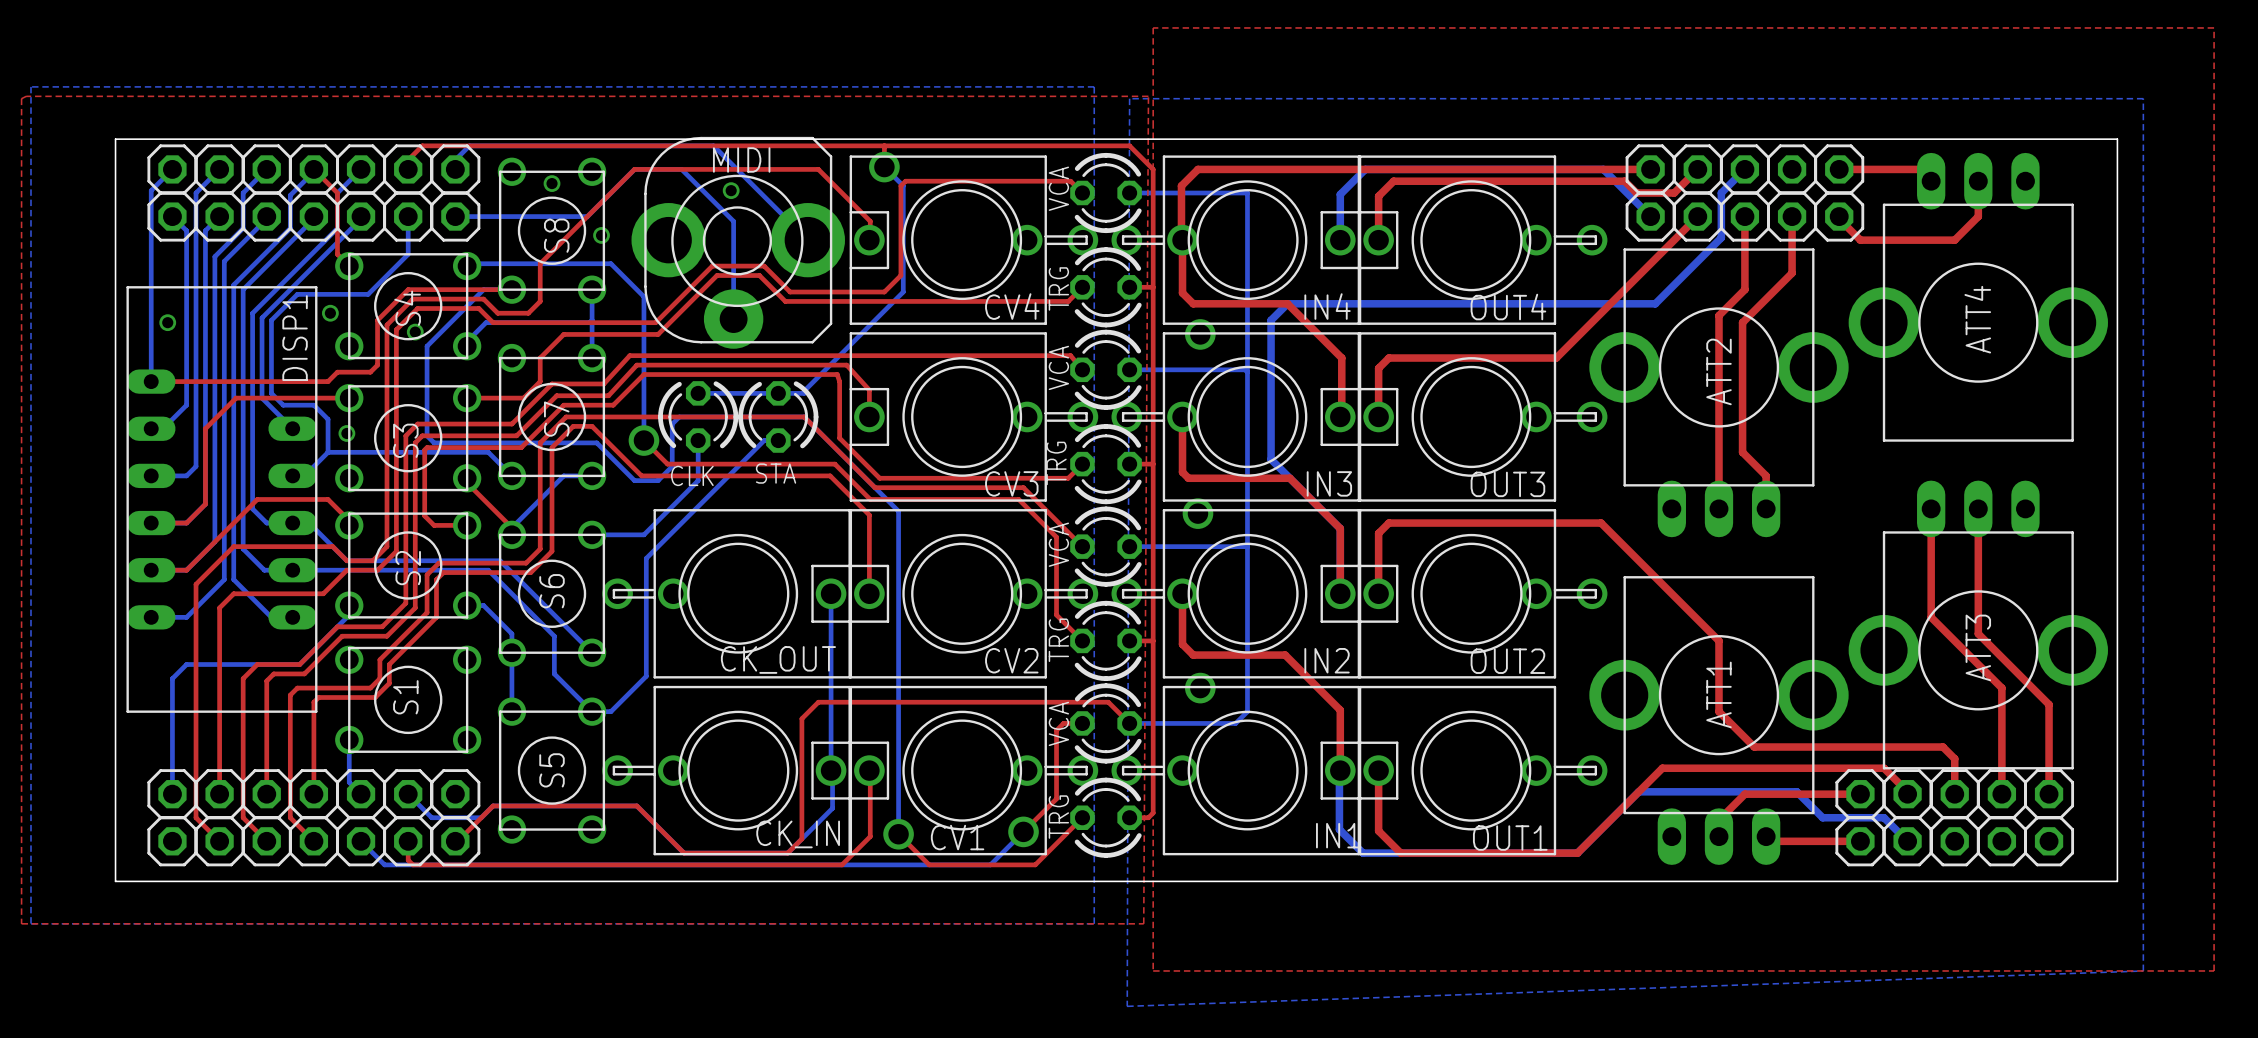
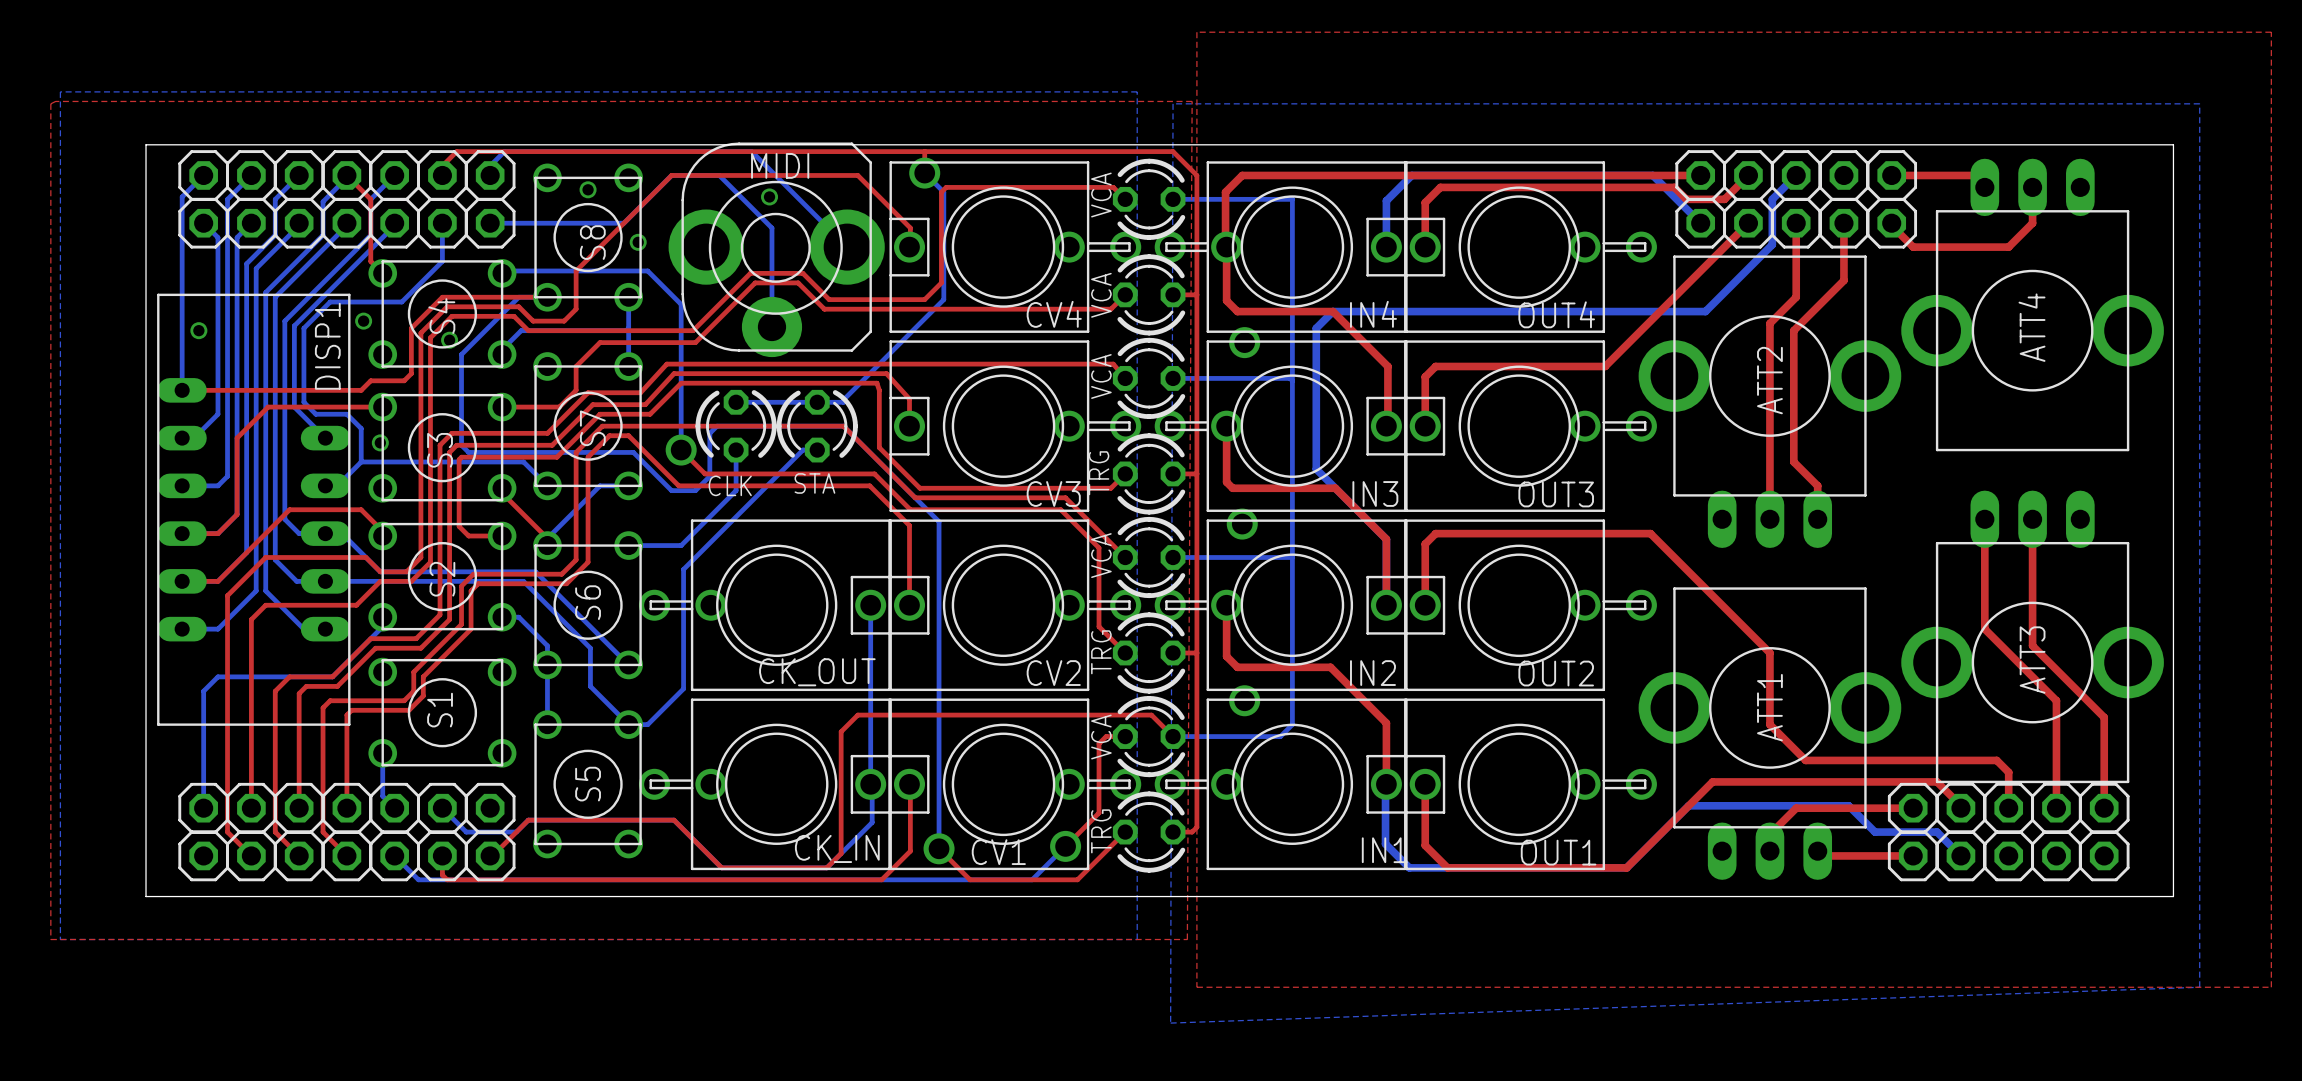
text: TRG (1058, 288) -> VCA (1101, 295)

